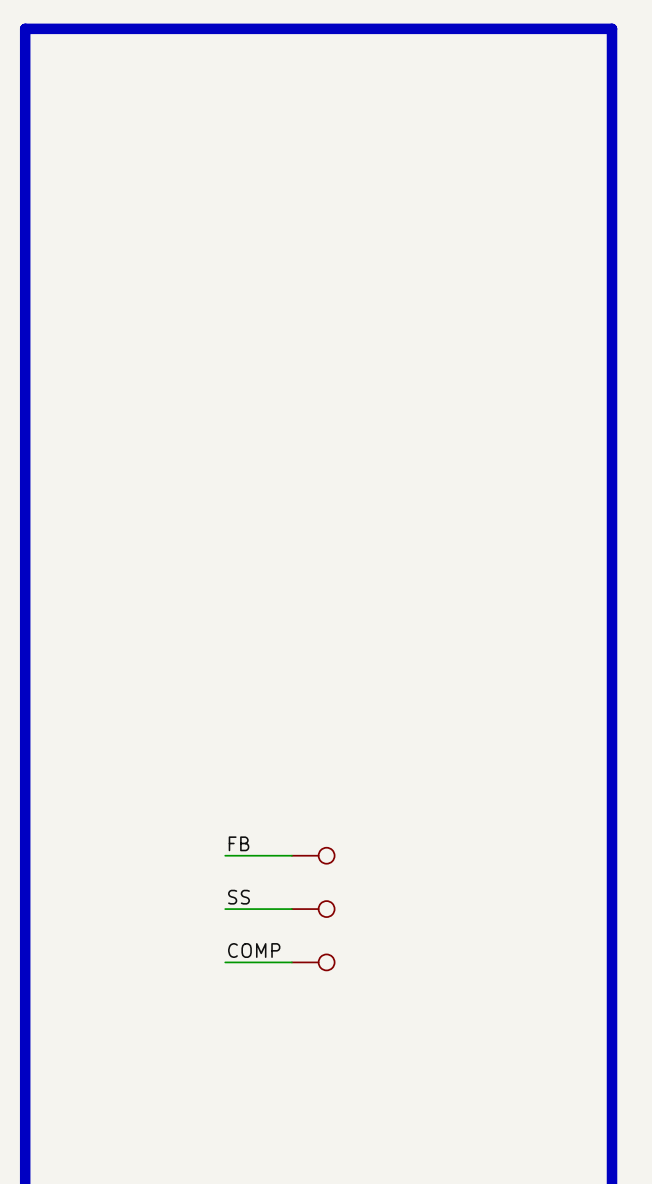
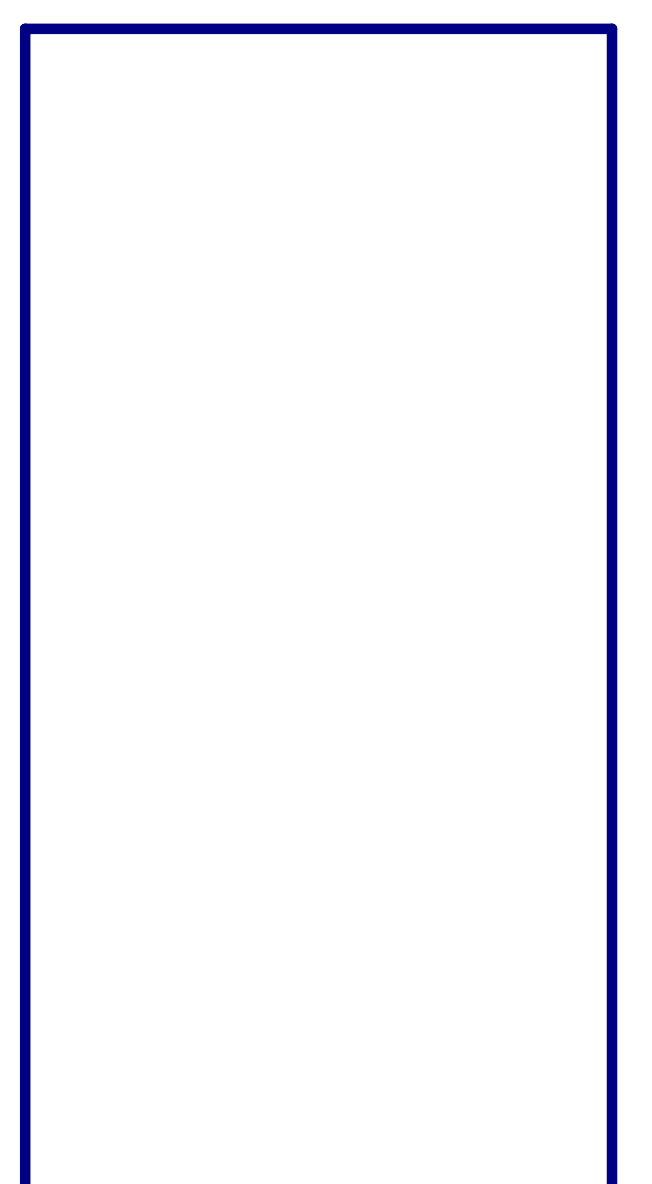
label: FB (239, 843) -> none
wire: (225, 855) (291, 855) -> none
part: (313, 855) -> none
label: SS (239, 897) -> none
wire: (225, 909) (291, 909) -> none
part: (313, 909) -> none
label: COMP (254, 950) -> none
wire: (225, 962) (291, 962) -> none
part: (313, 962) -> none

